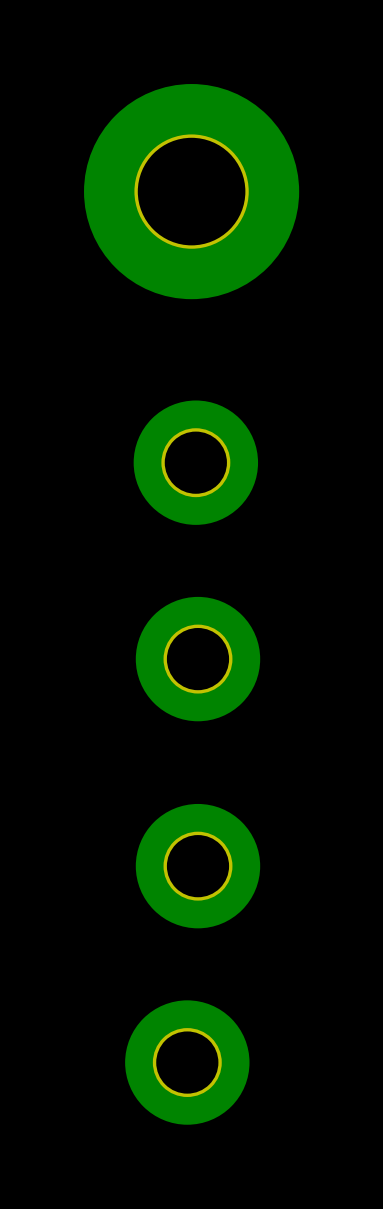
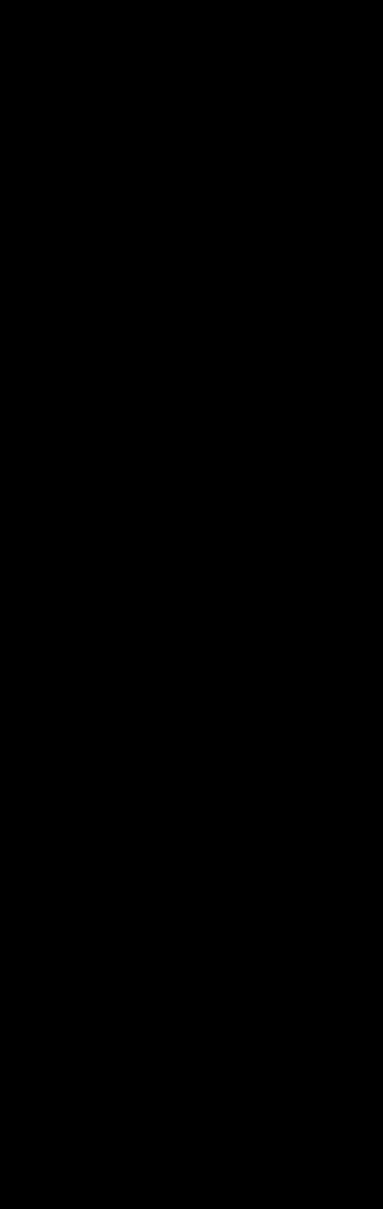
part: (191, 191) -> none
part: (195, 462) -> none
part: (197, 659) -> none
part: (197, 866) -> none
part: (187, 1062) -> none

